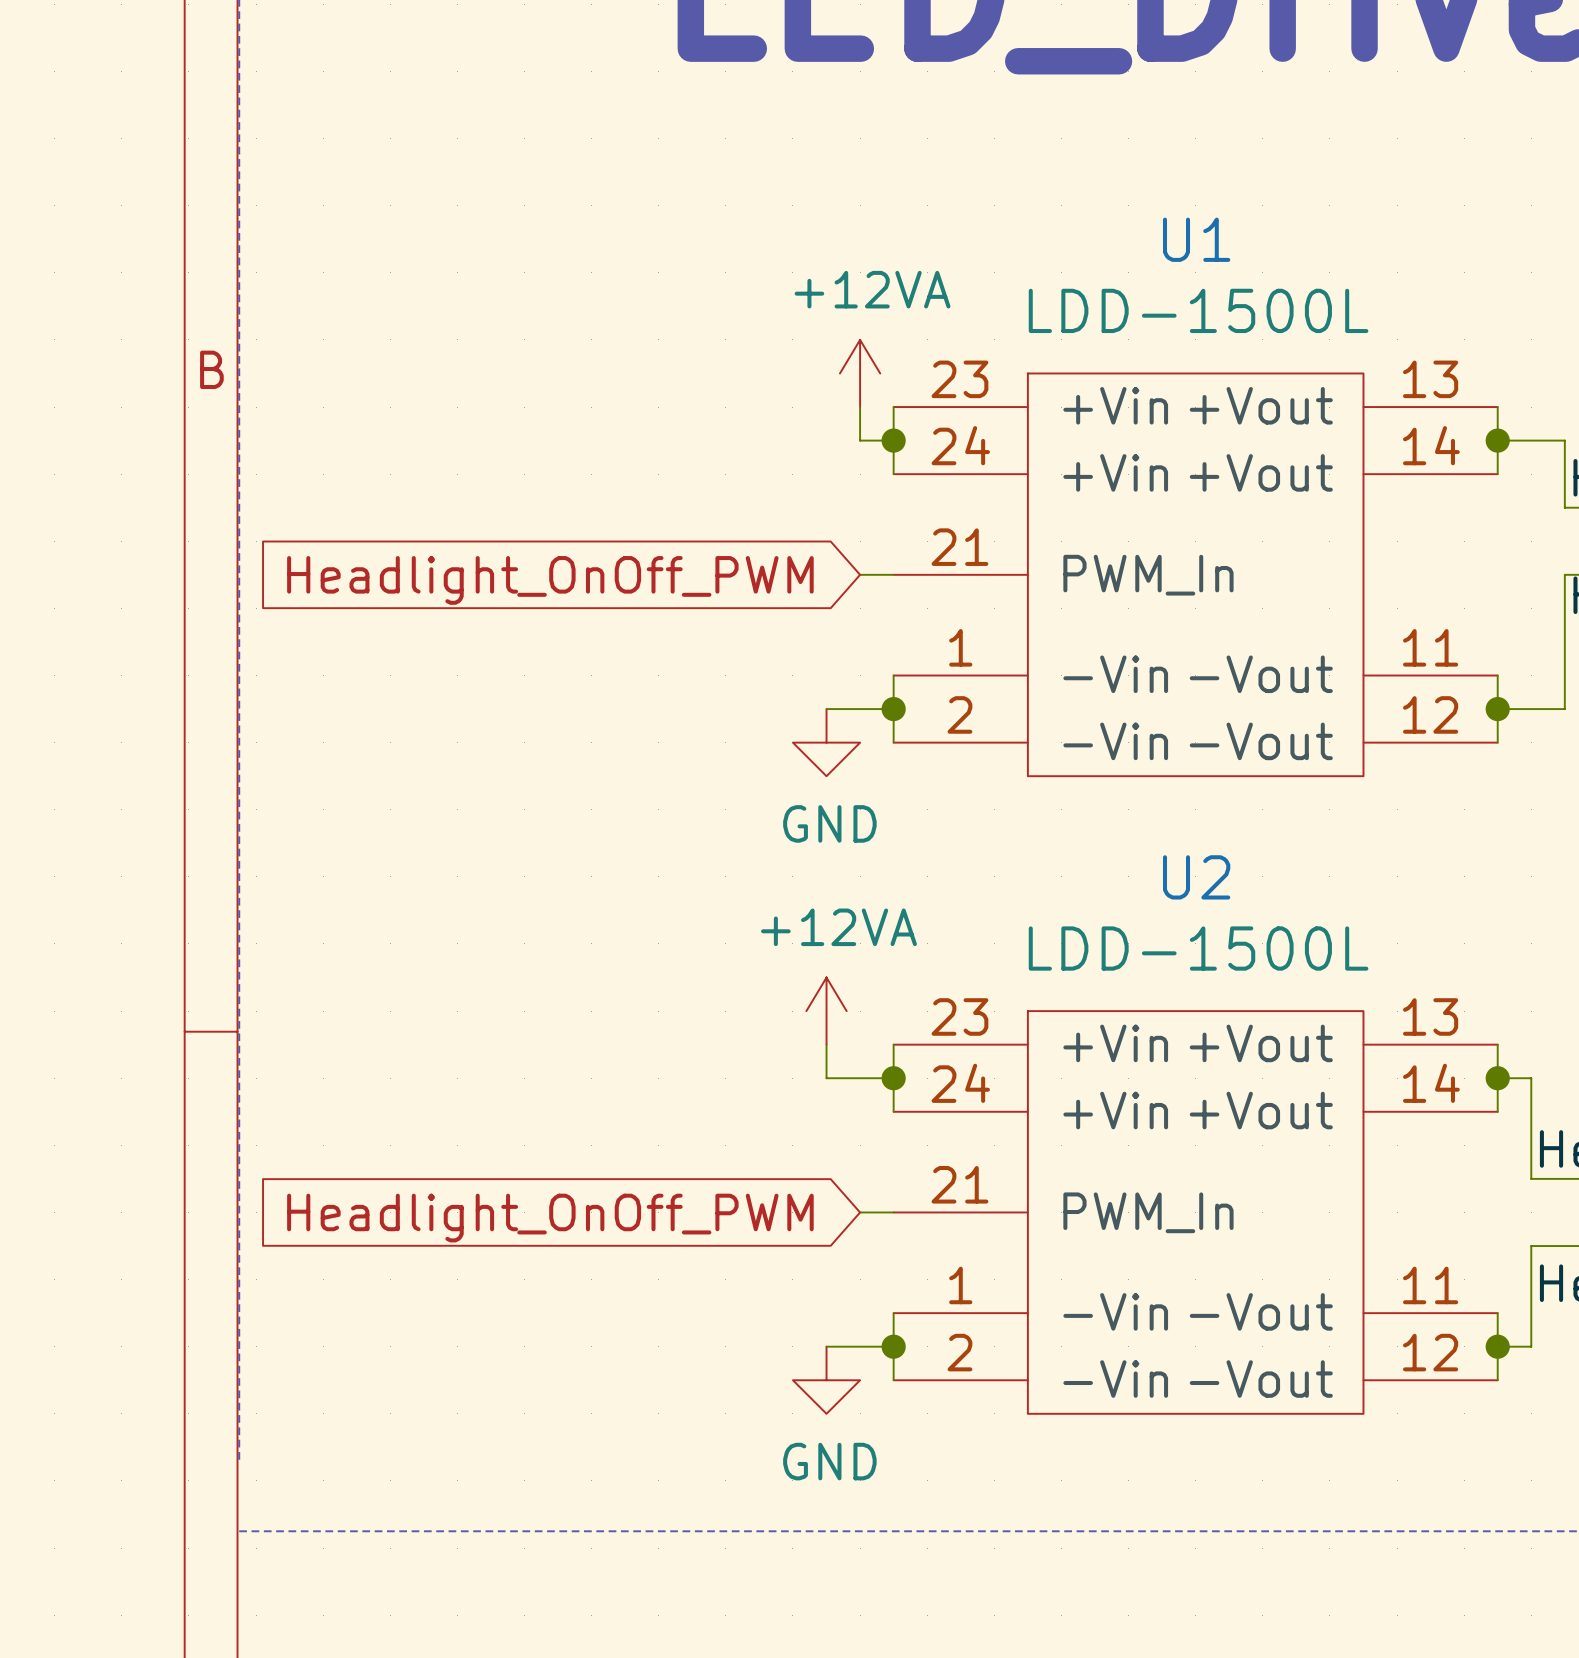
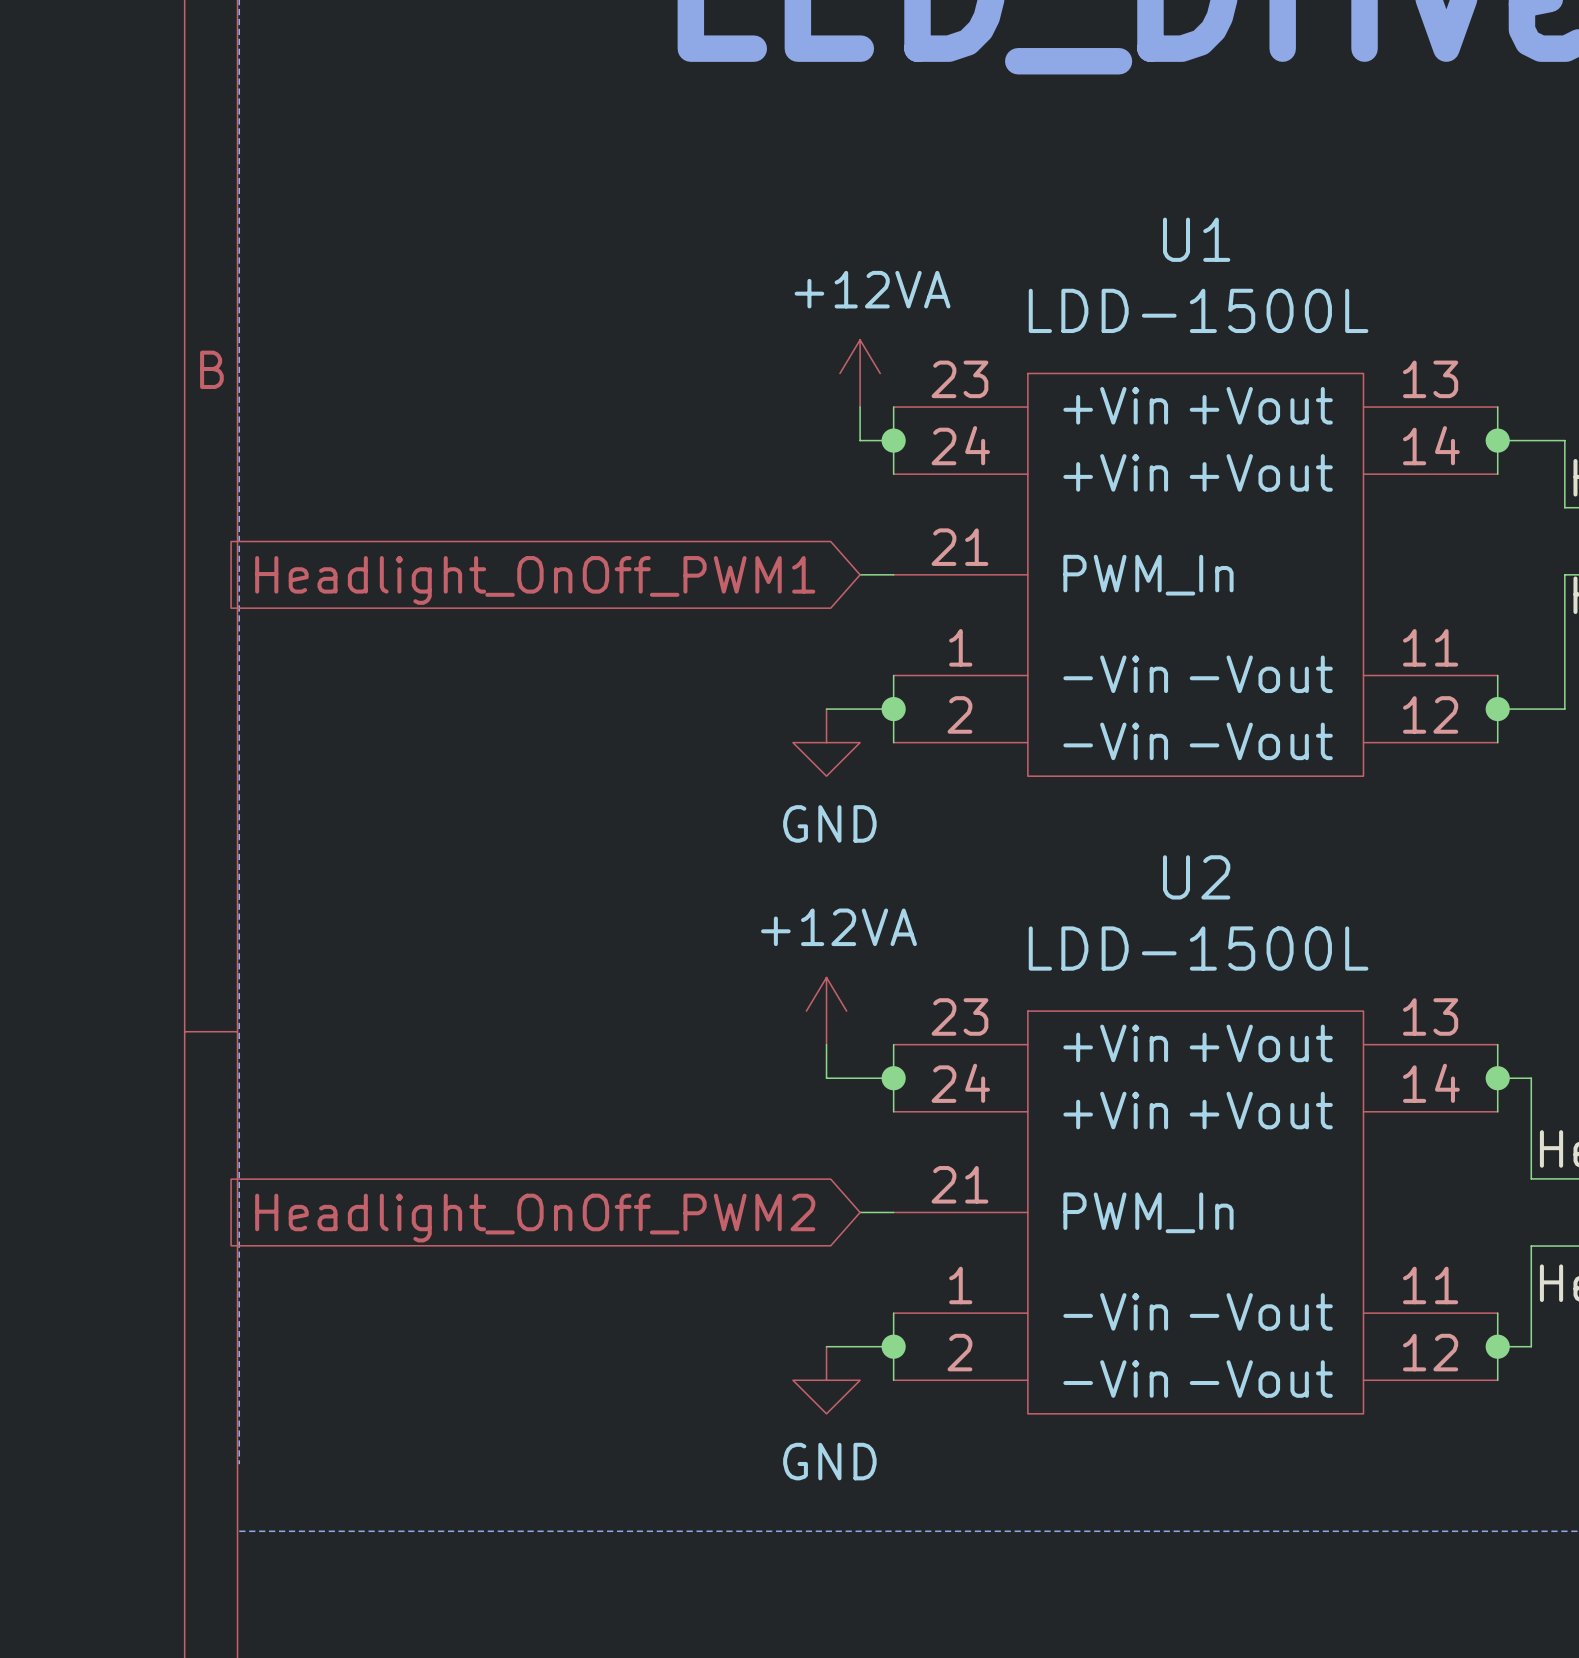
global label: Headlight_OnOff_PWM (550, 580) -> Headlight_OnOff_PWM1 (535, 580)
global label: Headlight_OnOff_PWM (550, 1218) -> Headlight_OnOff_PWM2 (535, 1218)

